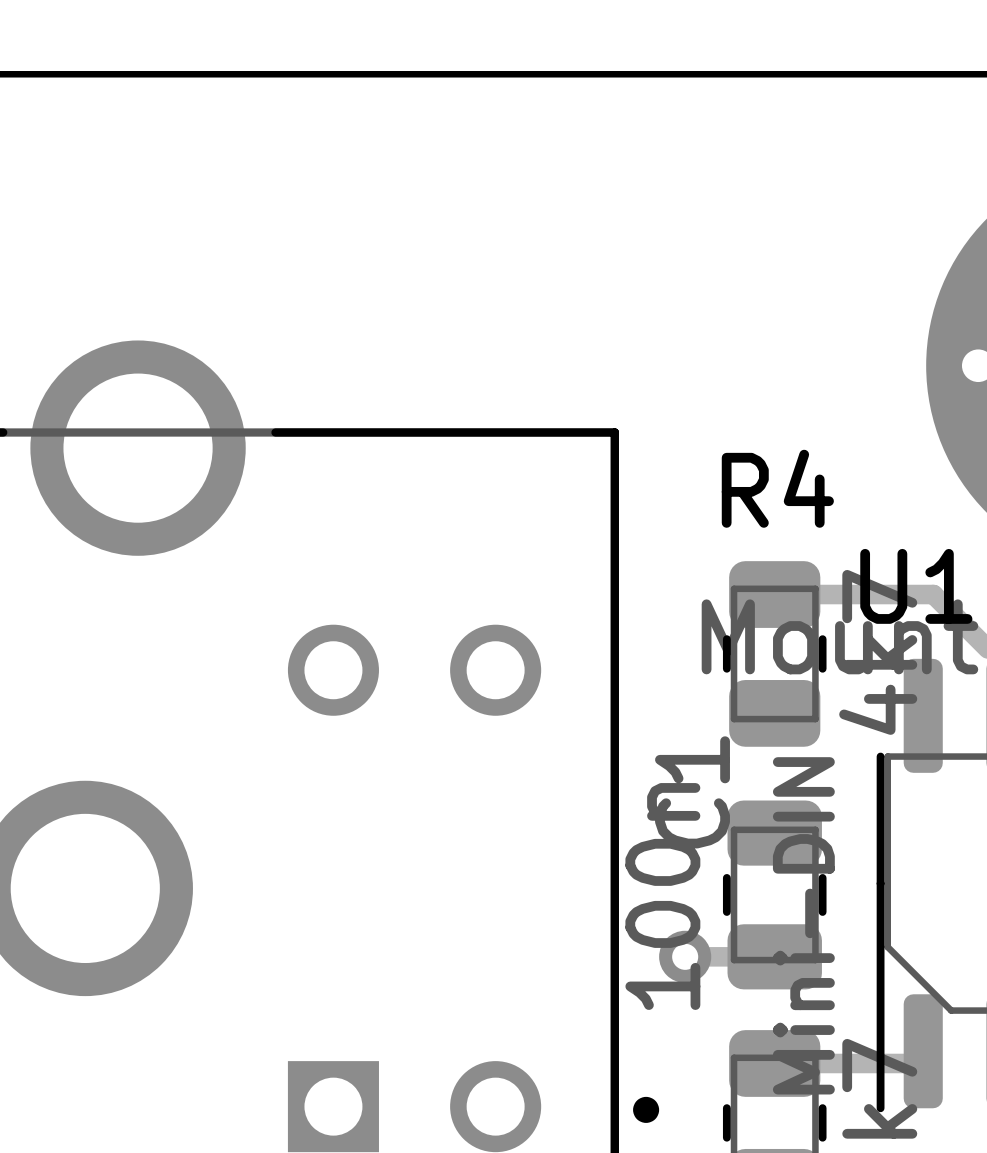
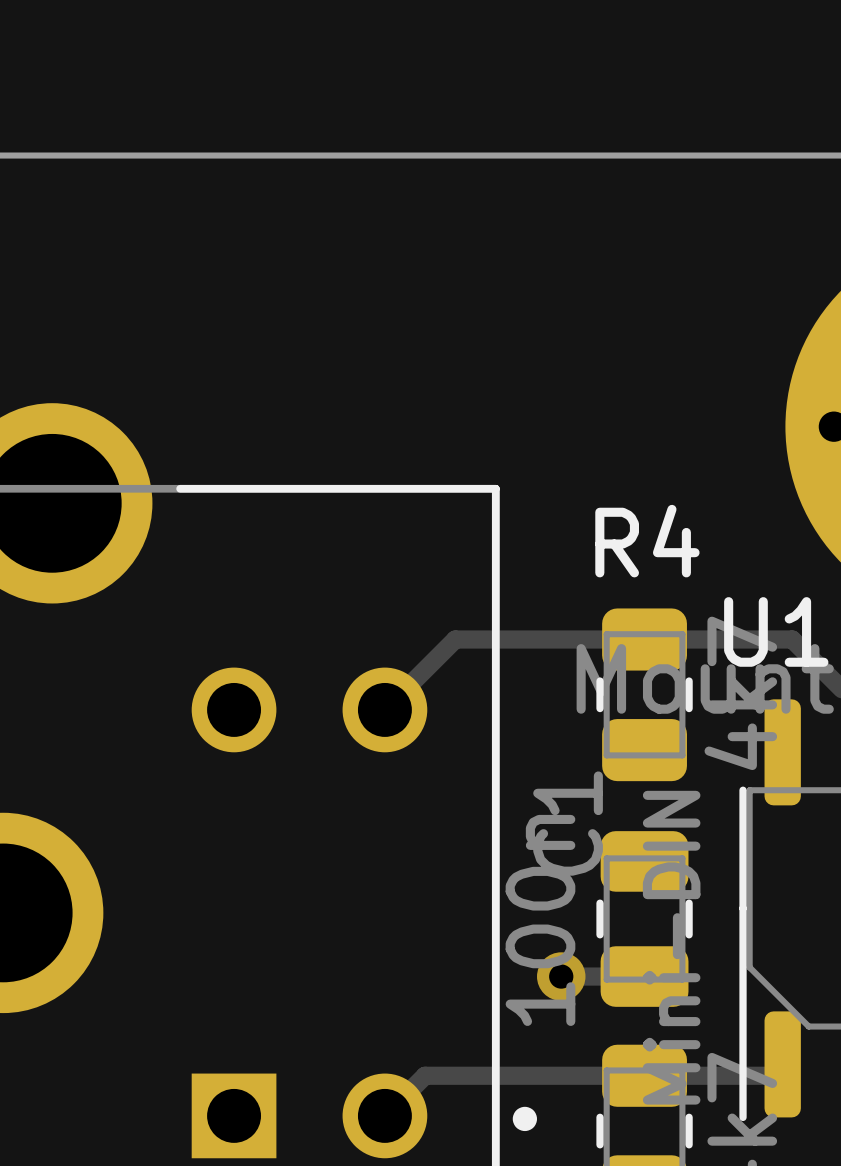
track: none -> (644, 639) (455, 639) (384, 709)
track: none -> (644, 1075) (425, 1075) (384, 1115)

